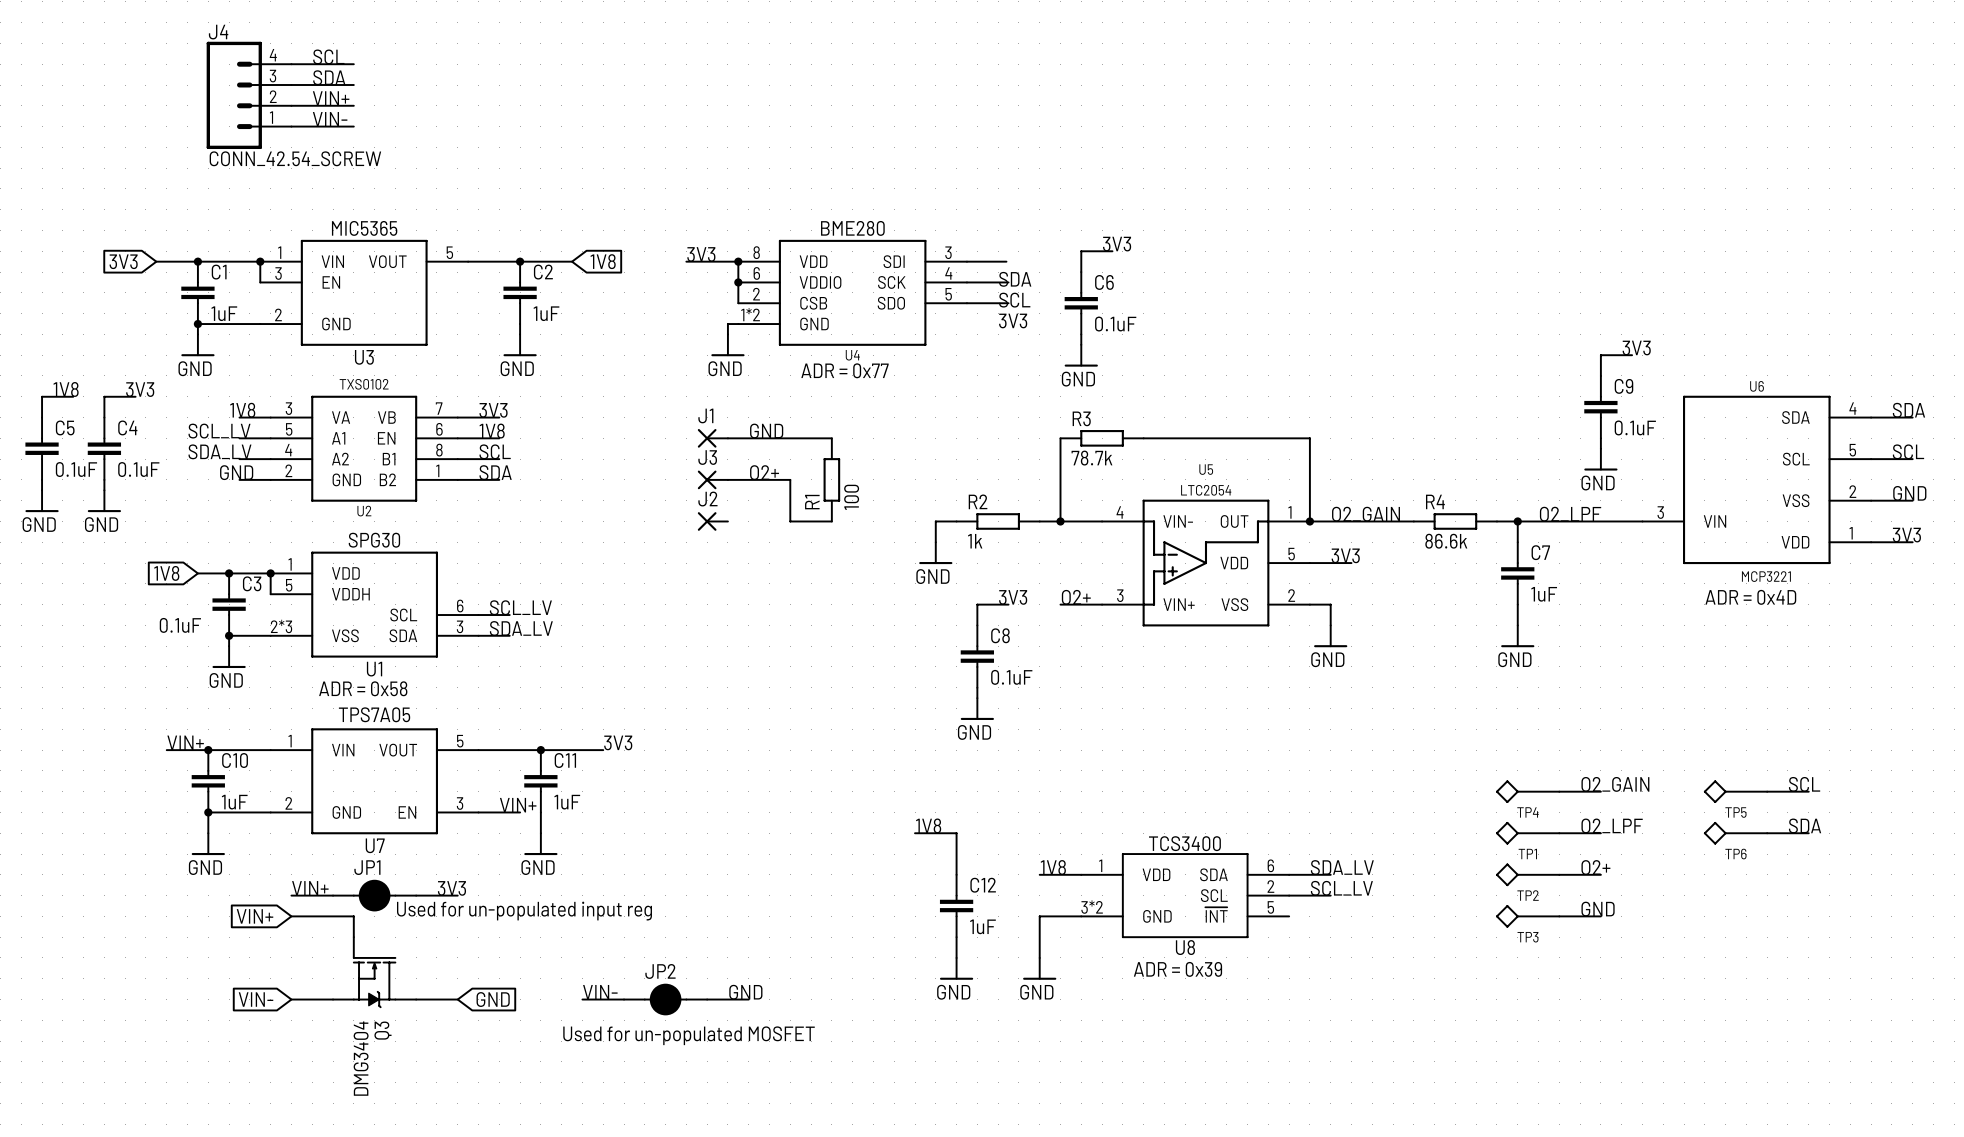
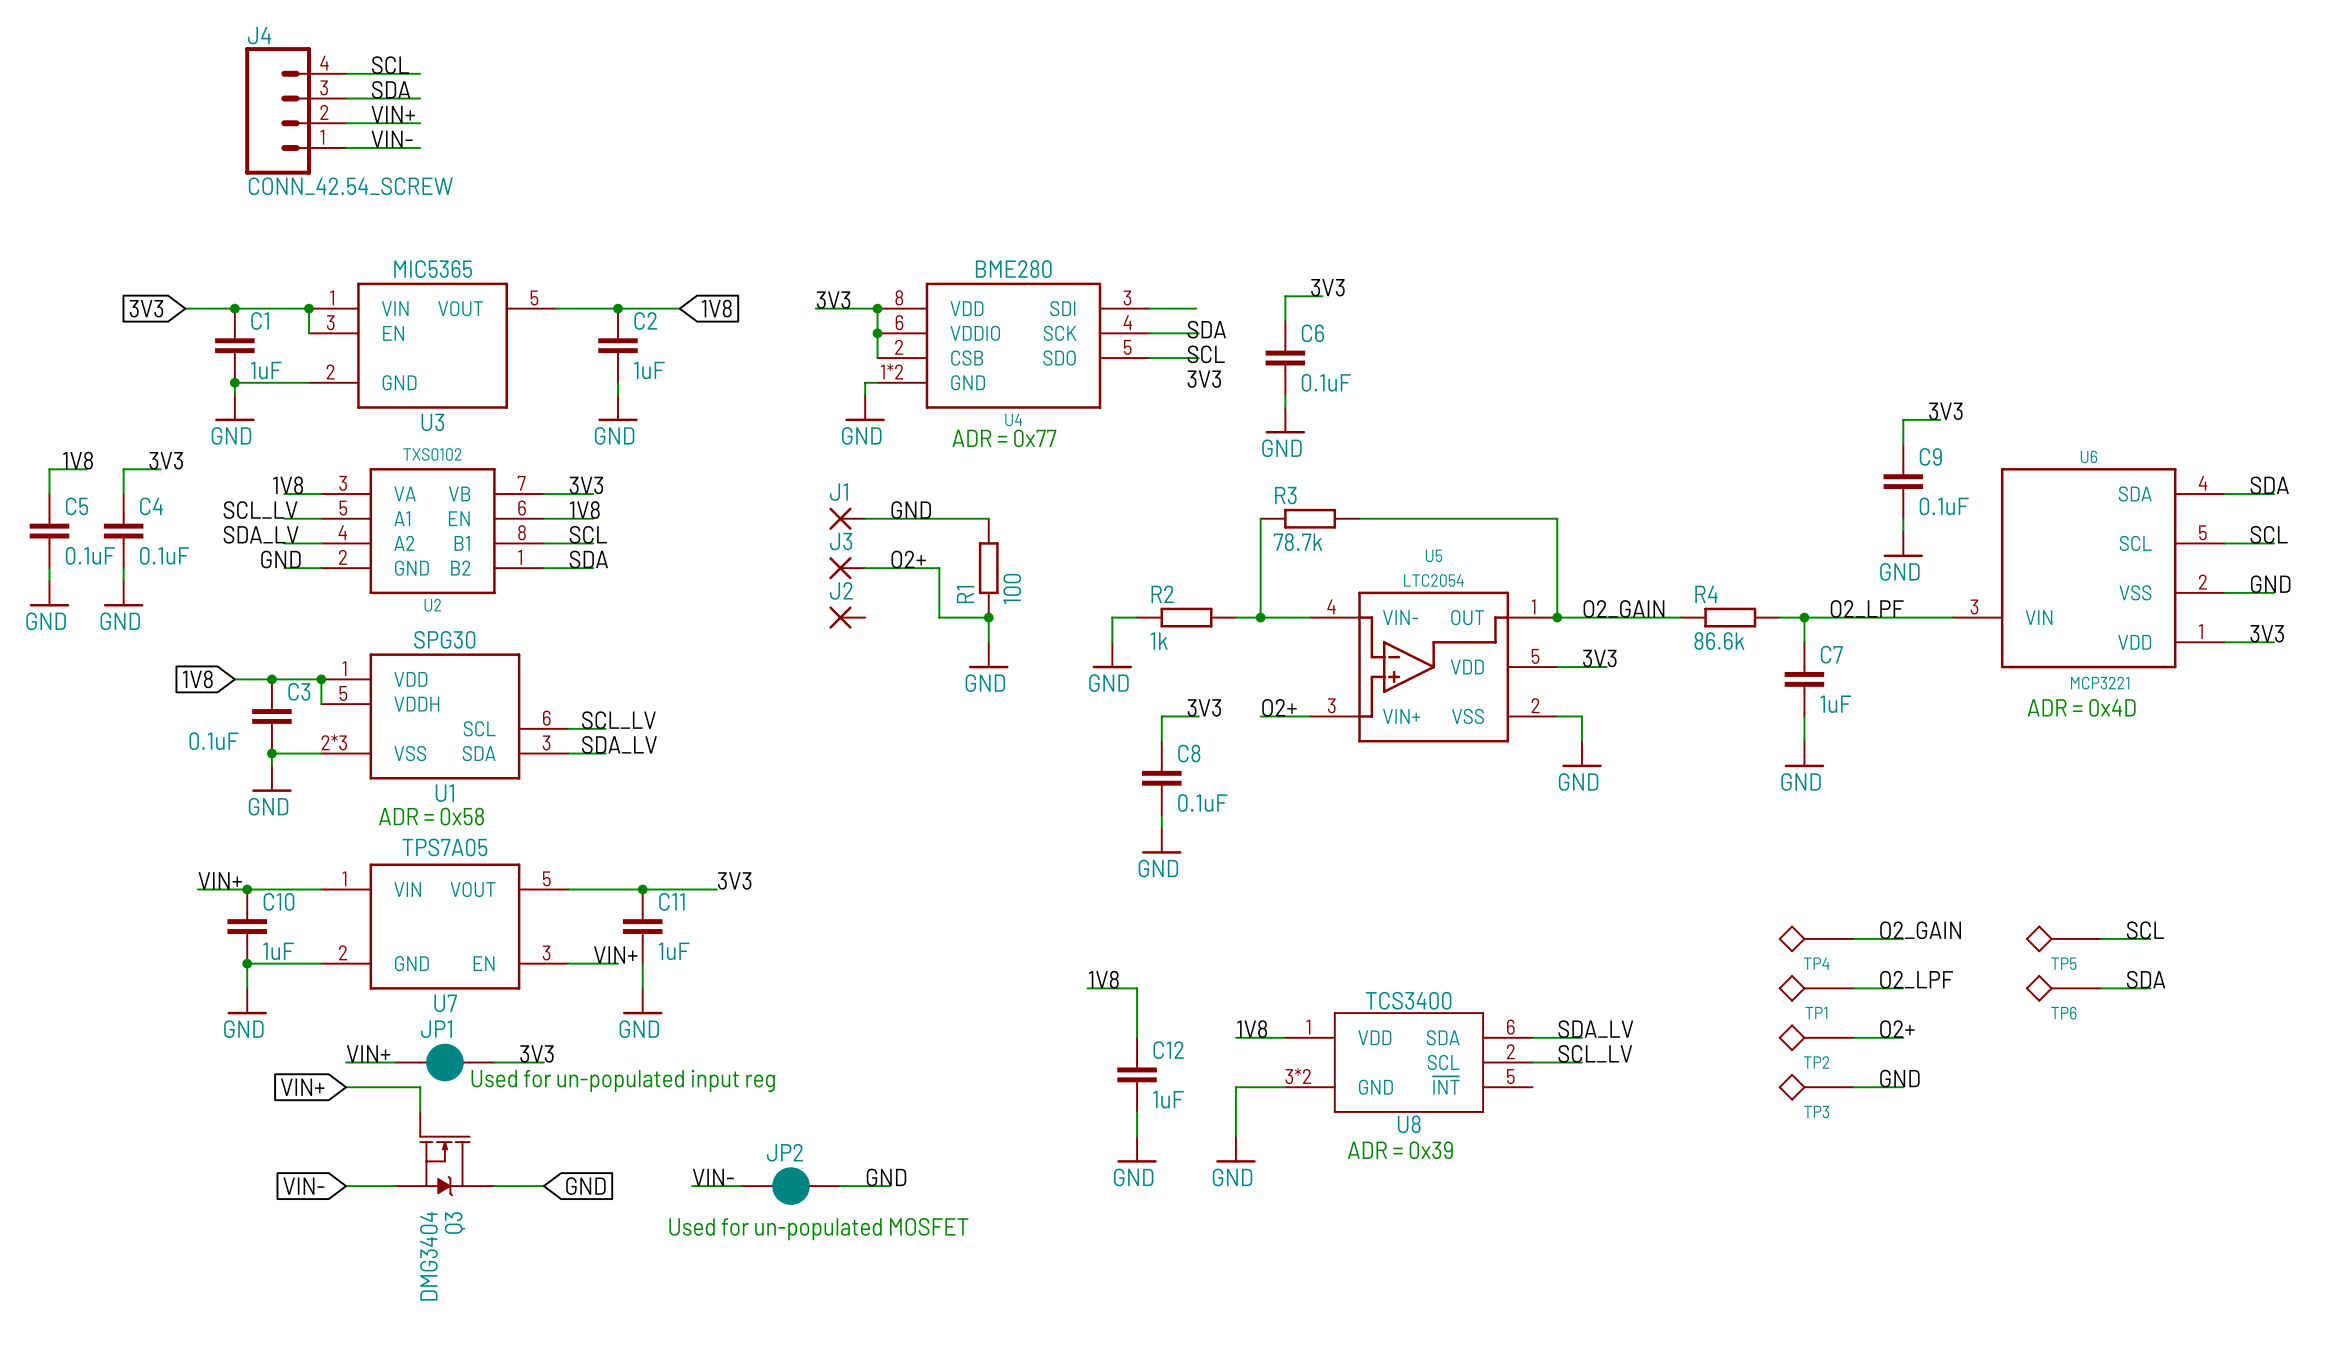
wire: none -> (988, 617) (988, 642)
junction: none -> (988, 617)
power symbol: none -> GND (988, 655)

